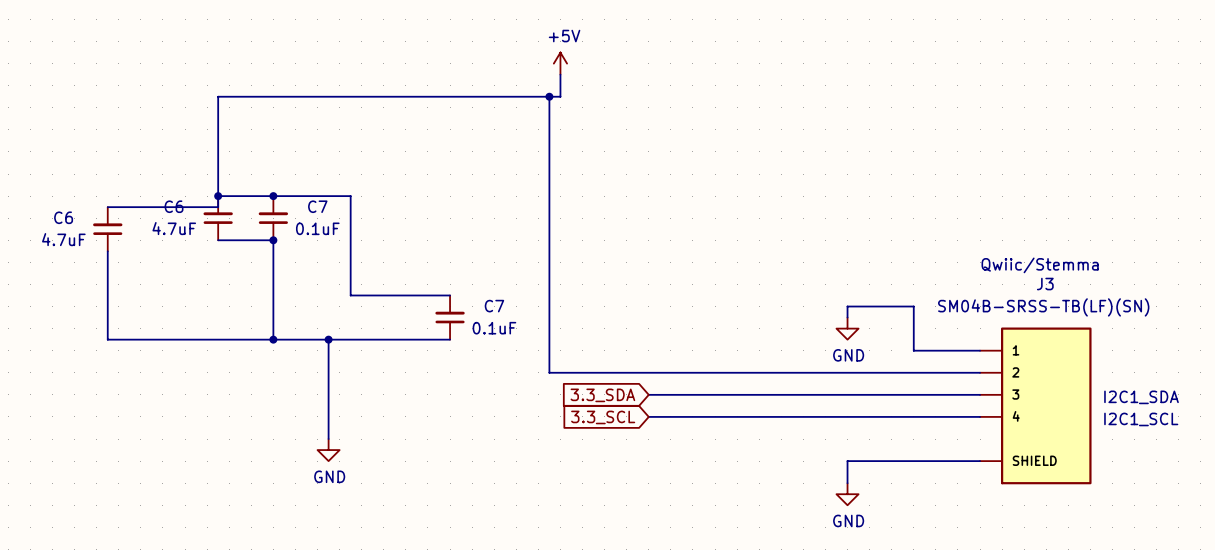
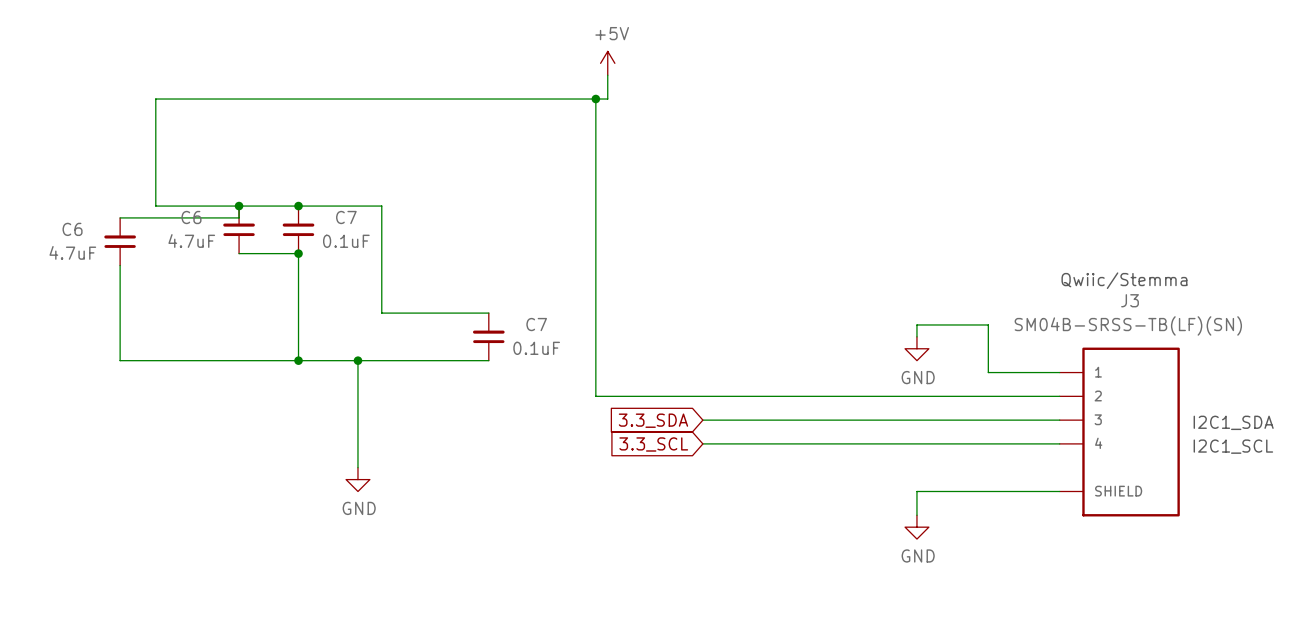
wire: (218, 96) (218, 196) -> (239, 99) (155, 99) (155, 206) (239, 206)

